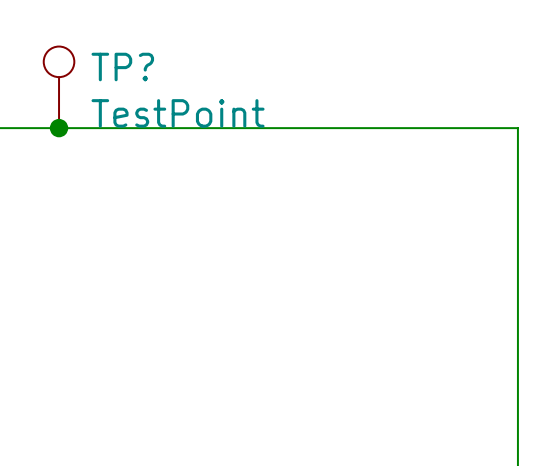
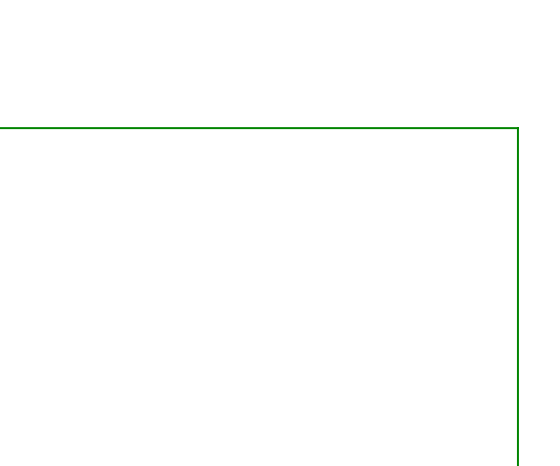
TP?: TestPoint (59, 87) -> none
junction: (59, 128) -> none

